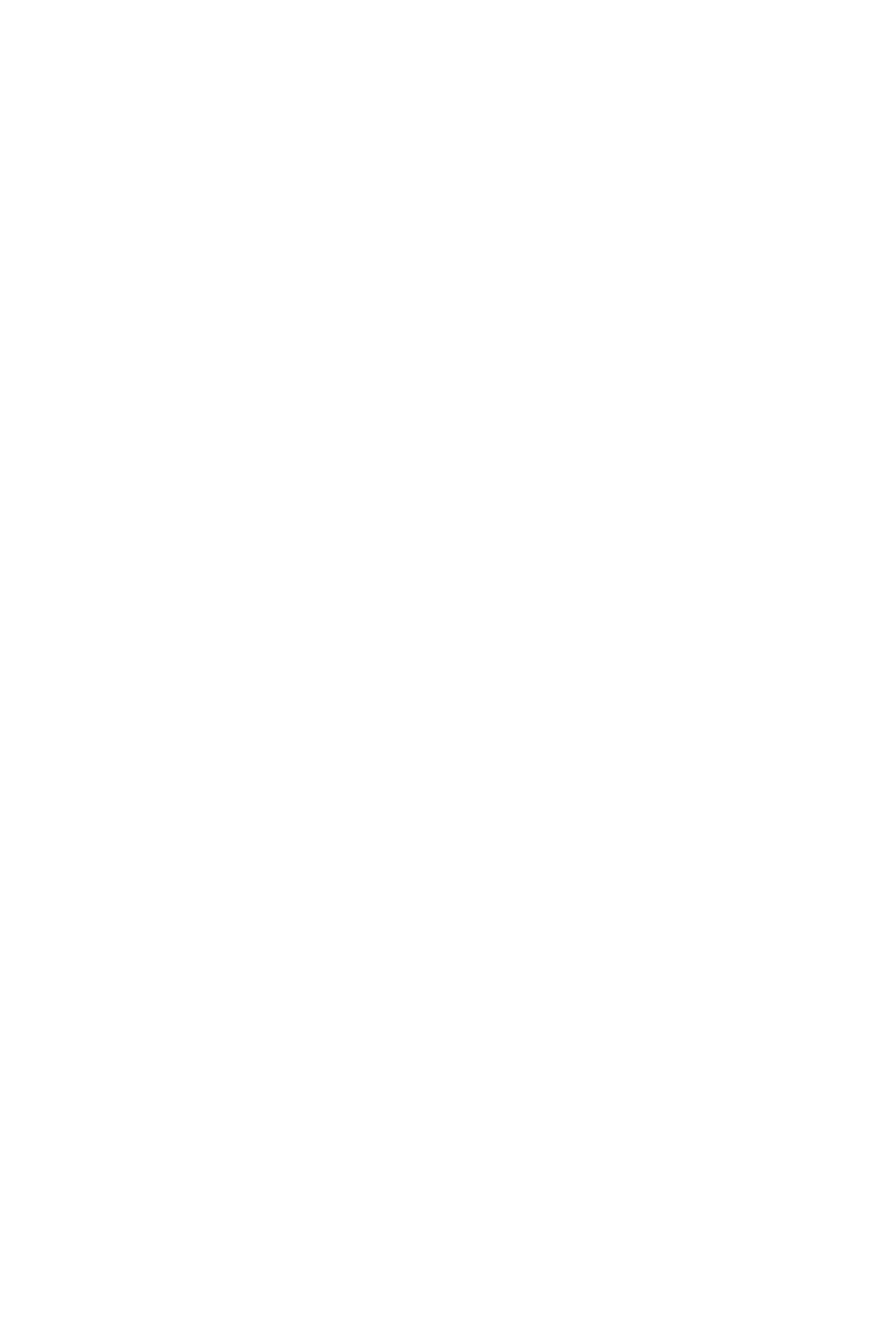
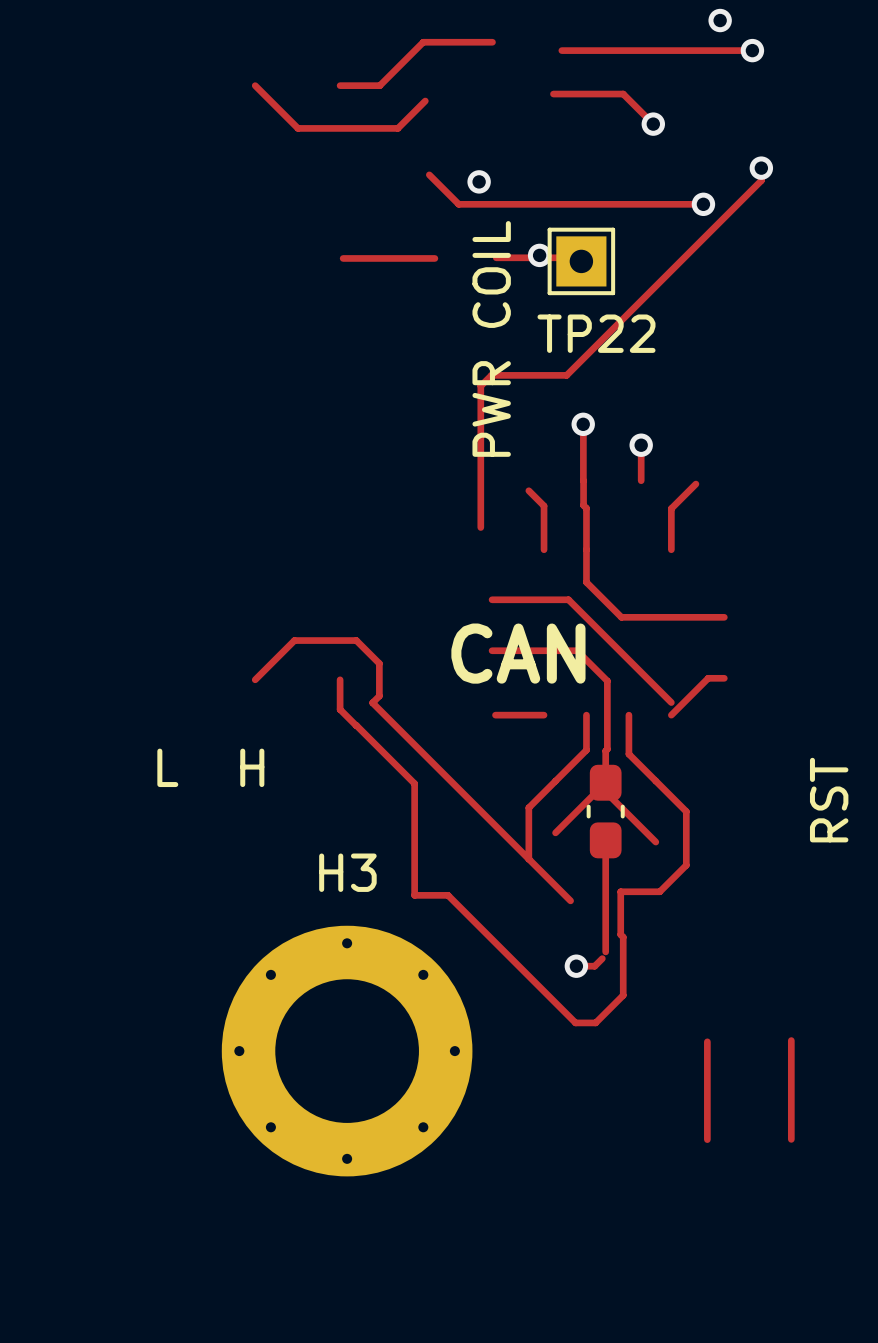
via: none -> (720, 20)
track: none -> (492, 42) (423, 42) (379, 85) (340, 85)
track: none -> (561, 50) (752, 50)
via: none -> (752, 50)
track: none -> (255, 85) (298, 128) (397, 128) (425, 101)
track: none -> (553, 94) (623, 94) (653, 124)
via: none -> (653, 124)
track: none -> (761, 168) (761, 180) (566, 375) (491, 375) (480, 386) (480, 527)
via: none -> (761, 168)
track: none -> (429, 174) (458, 204) (703, 204)
via: none -> (479, 181)
via: none -> (703, 204)
via: none -> (539, 255)
track: none -> (496, 257) (563, 257)
track: none -> (343, 258) (434, 258)
TP22: none -> (581, 261)
text: none -> PWR COIL (491, 338)
track: none -> (583, 424) (586, 582) (621, 617) (724, 617)
via: none -> (583, 424)
track: none -> (641, 445) (641, 480)
via: none -> (641, 445)
track: none -> (695, 484) (671, 508) (671, 549)
track: none -> (528, 490) (544, 505) (544, 549)
track: none -> (492, 599) (568, 599) (671, 702)
track: none -> (492, 650) (577, 650) (607, 681) (605, 782) (555, 832)
text: none -> CAN (518, 653)
track: none -> (724, 678) (708, 678) (671, 715)
track: none -> (255, 679) (294, 640) (356, 640) (379, 663) (379, 696) (372, 702) (570, 900)
track: none -> (340, 679) (340, 709) (355, 725)
track: none -> (495, 715) (544, 715)
track: none -> (586, 715) (586, 750) (528, 807) (528, 859)
track: none -> (628, 715) (628, 754) (686, 811) (686, 865) (659, 891) (620, 891) (623, 995) (595, 1022) (575, 1022) (448, 895) (414, 895) (414, 783) (356, 725)
text: none -> L (167, 767)
text: none -> H (252, 767)
track: none -> (605, 791) (655, 842)
text: none -> RST (829, 800)
part: none -> (605, 811)
track: none -> (605, 840) (605, 951)
track: none -> (602, 958) (594, 966) (576, 966)
via: none -> (576, 966)
track: none -> (791, 1040) (791, 1139)
track: none -> (707, 1041) (707, 1139)
H3: none -> (347, 1051)

